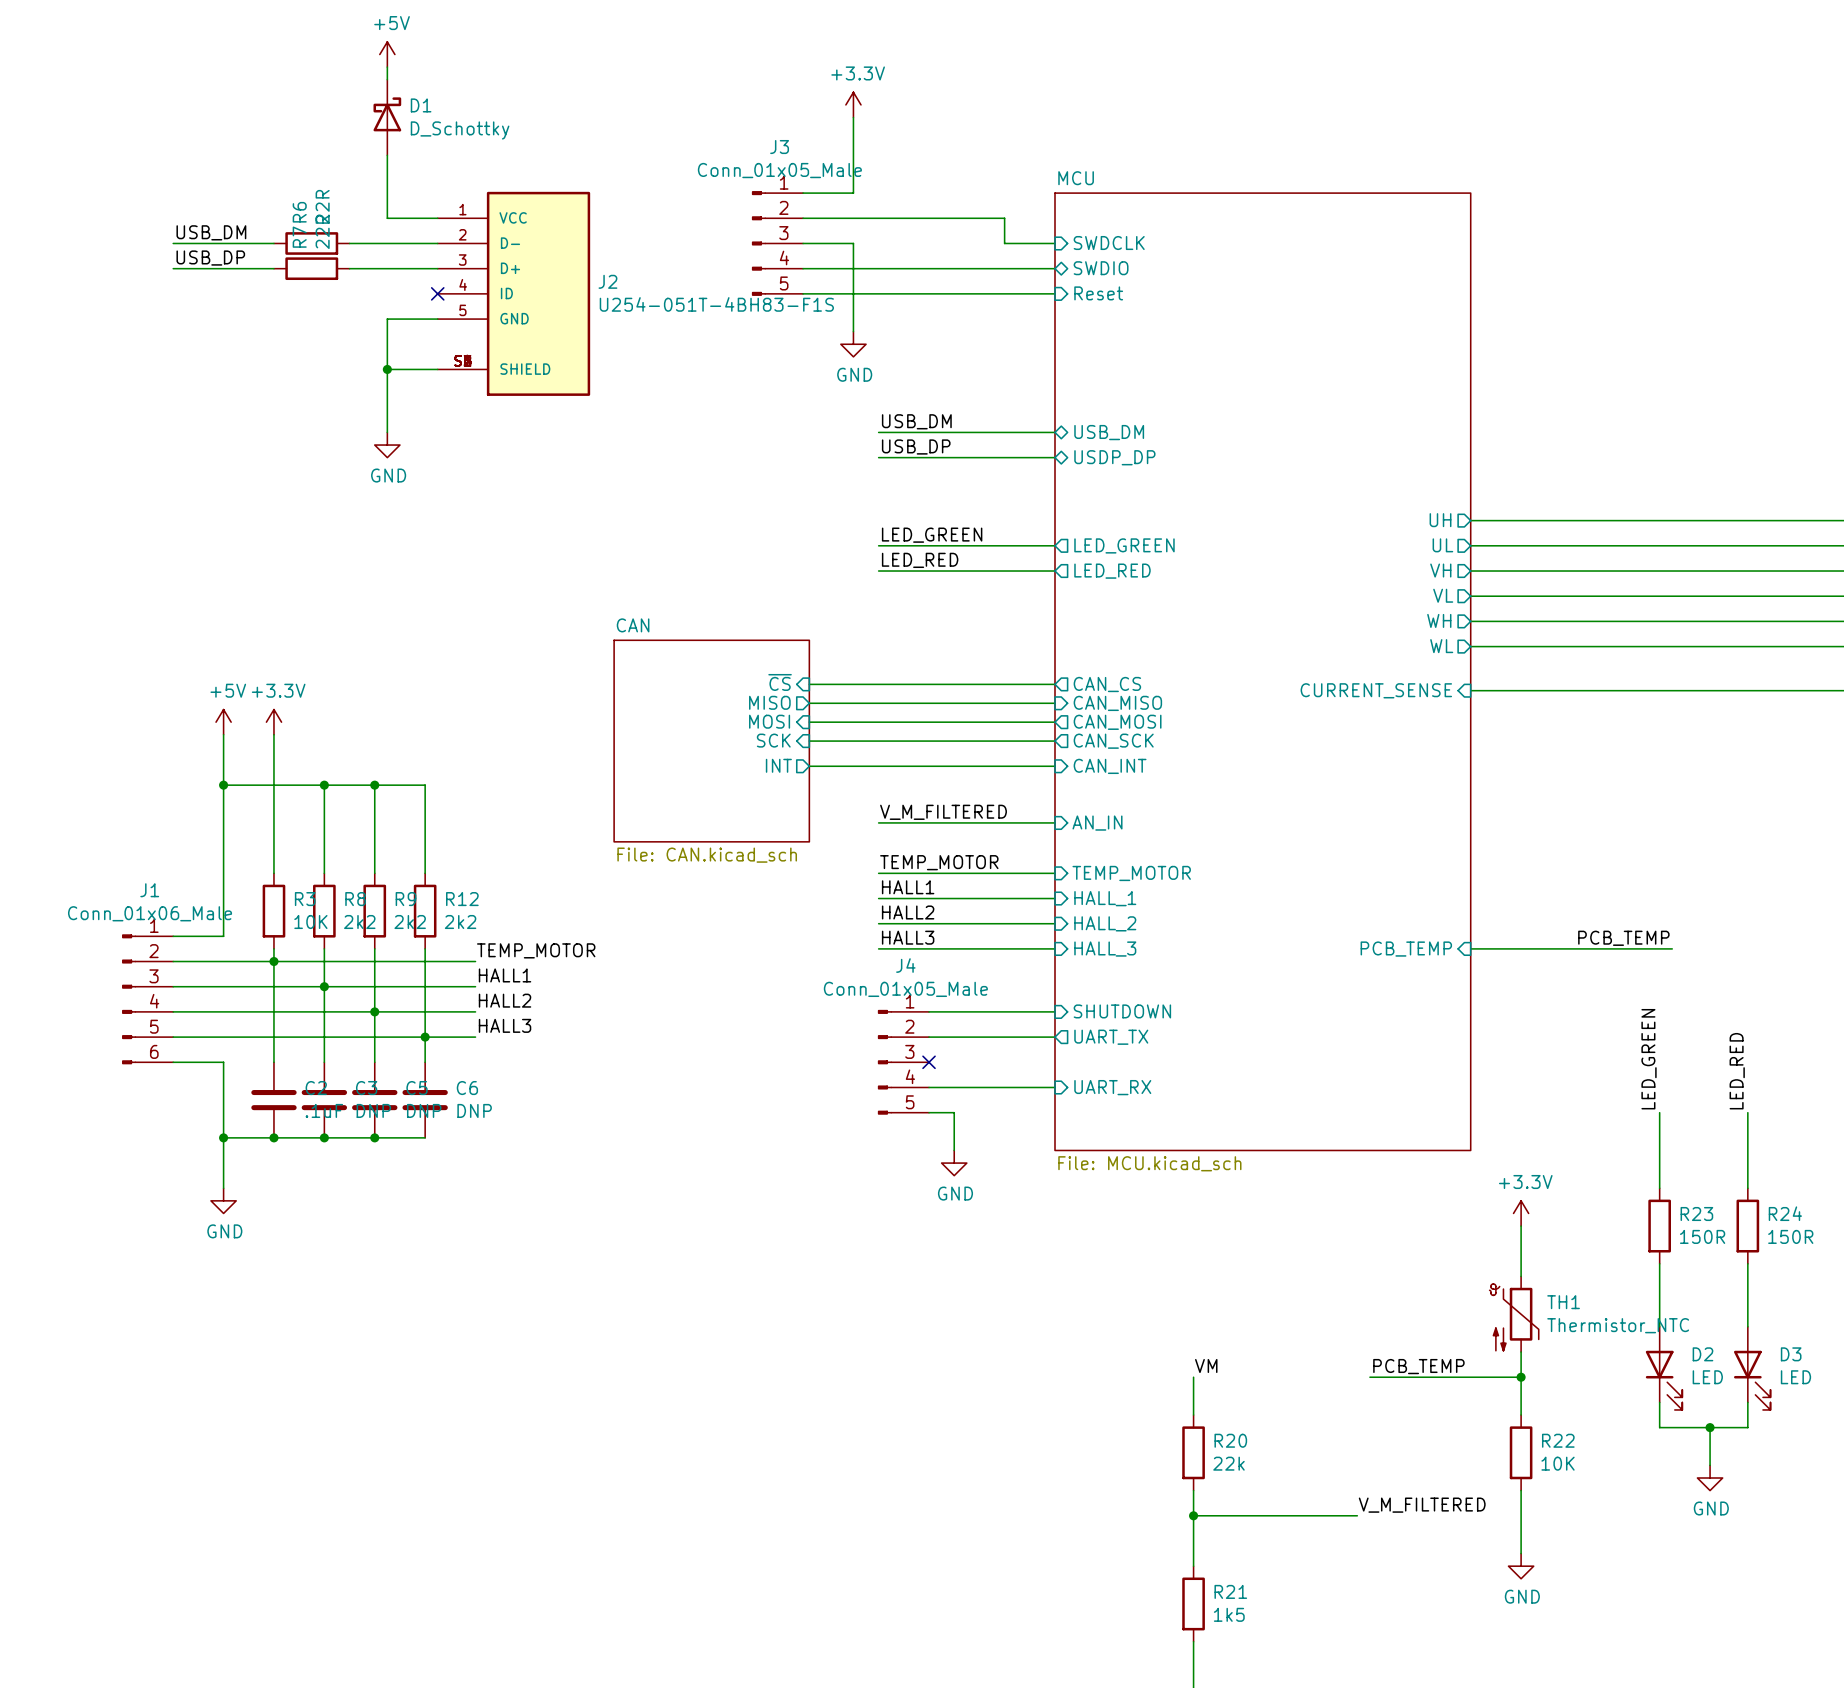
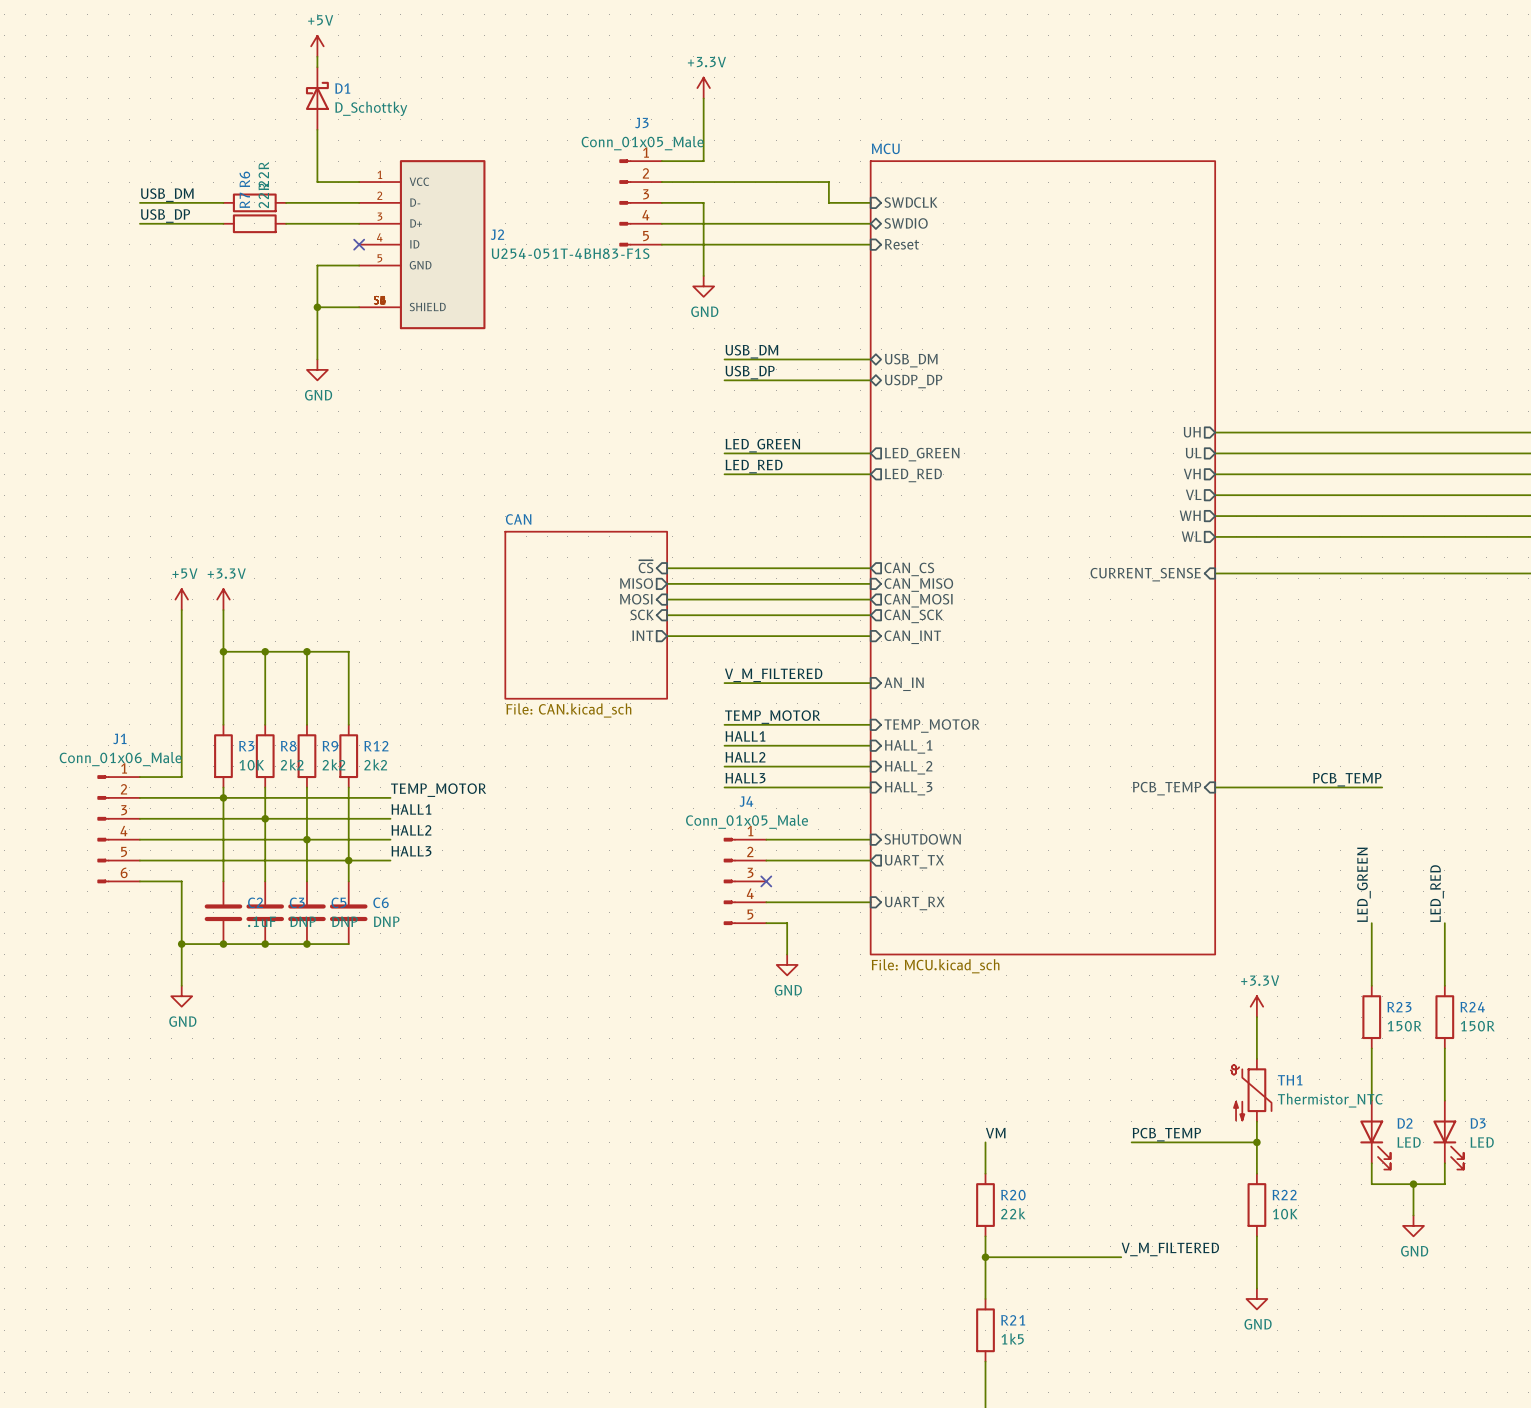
wire: (223, 785) (273, 785) -> none
junction position: (223, 785) -> (223, 651)

